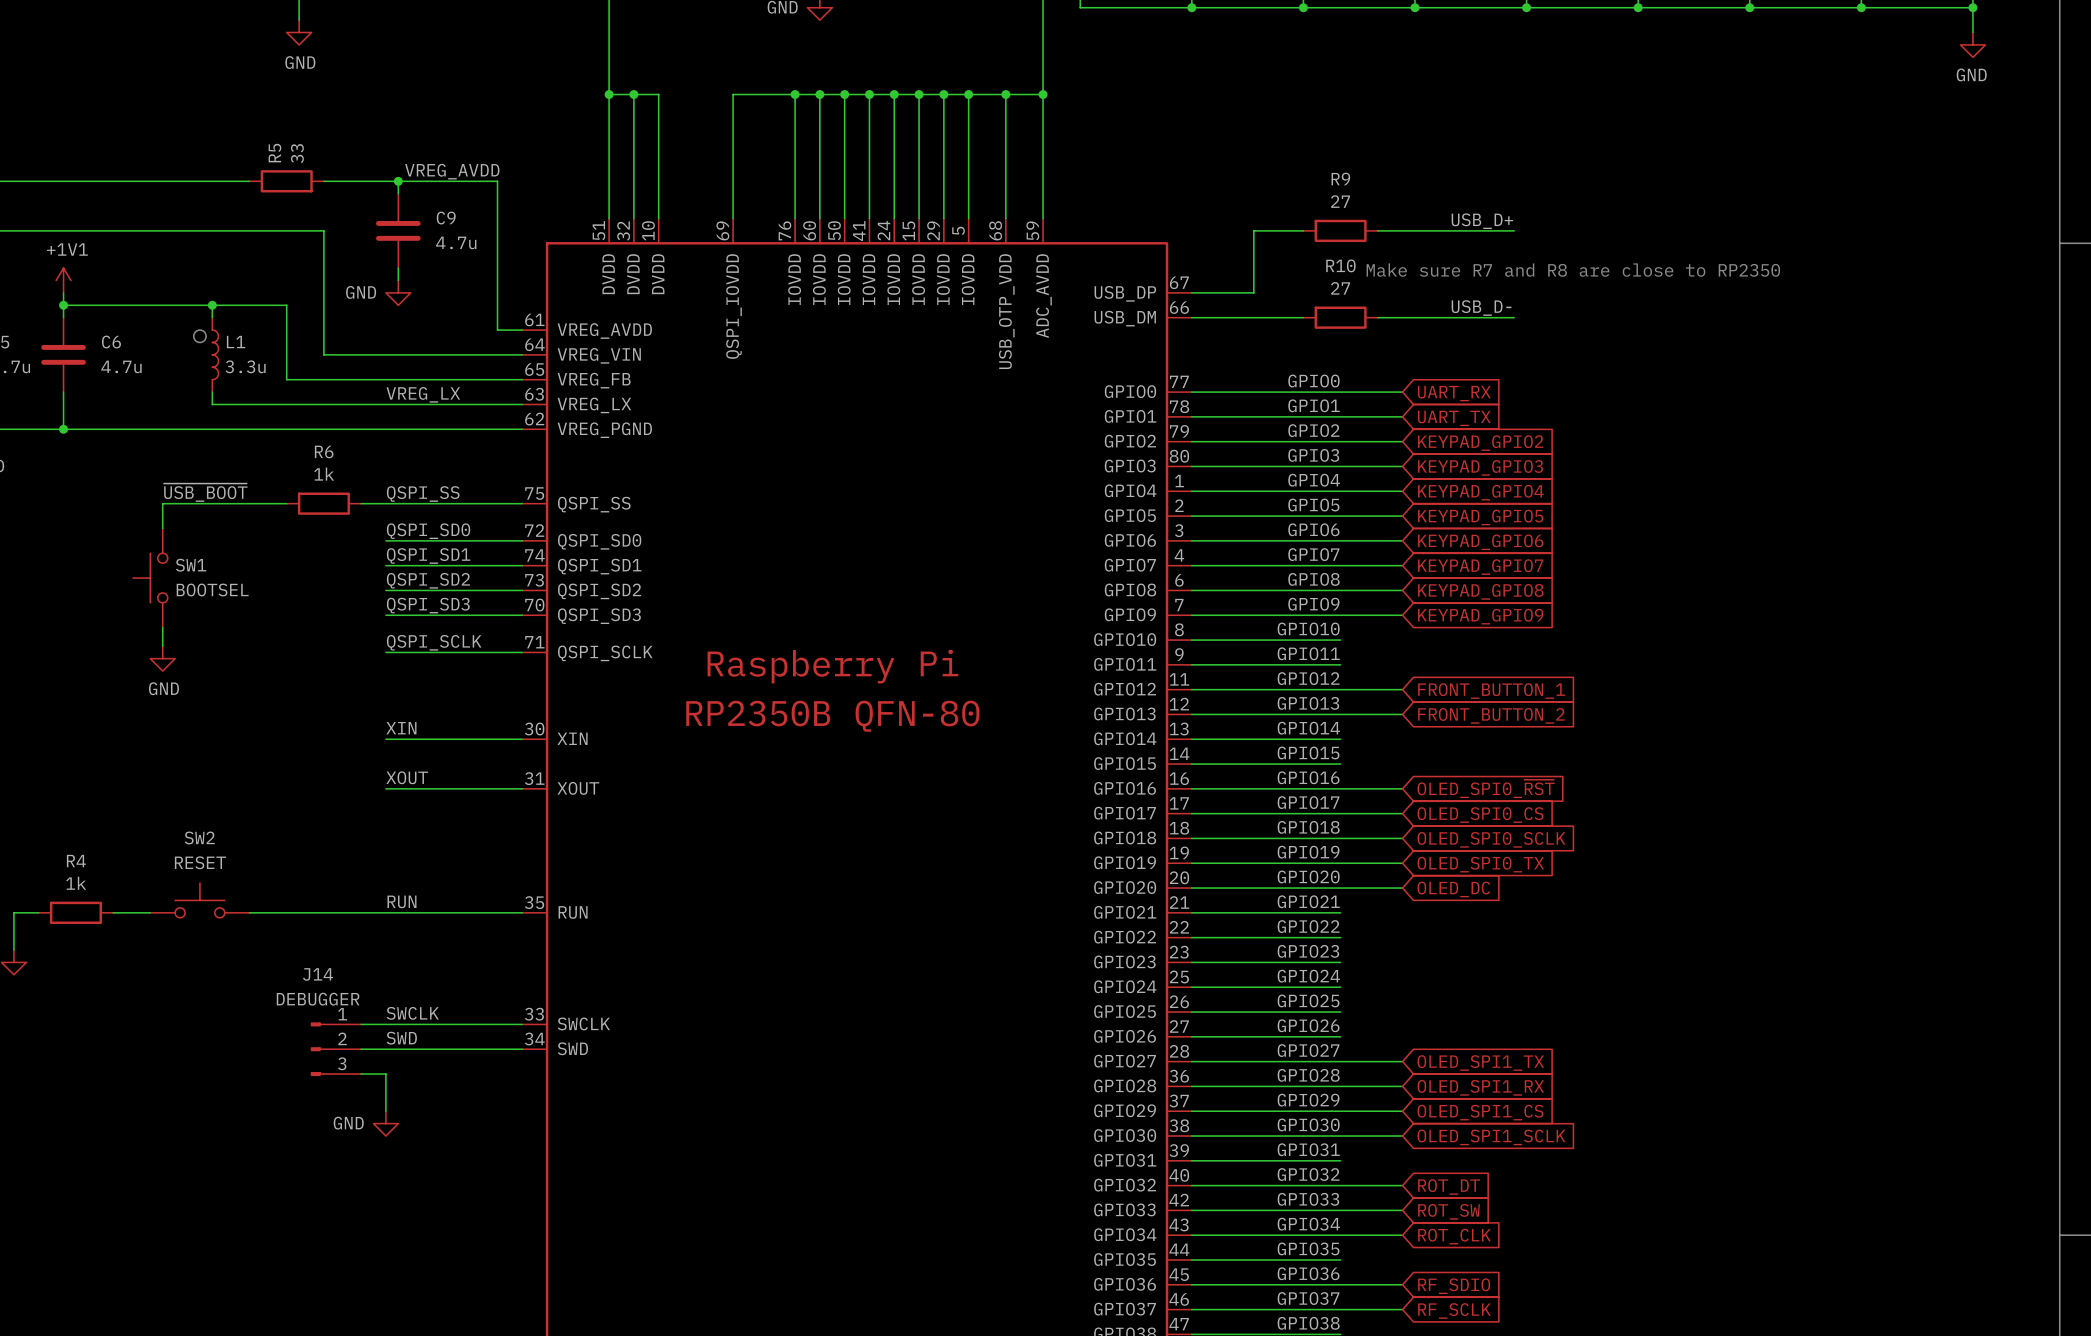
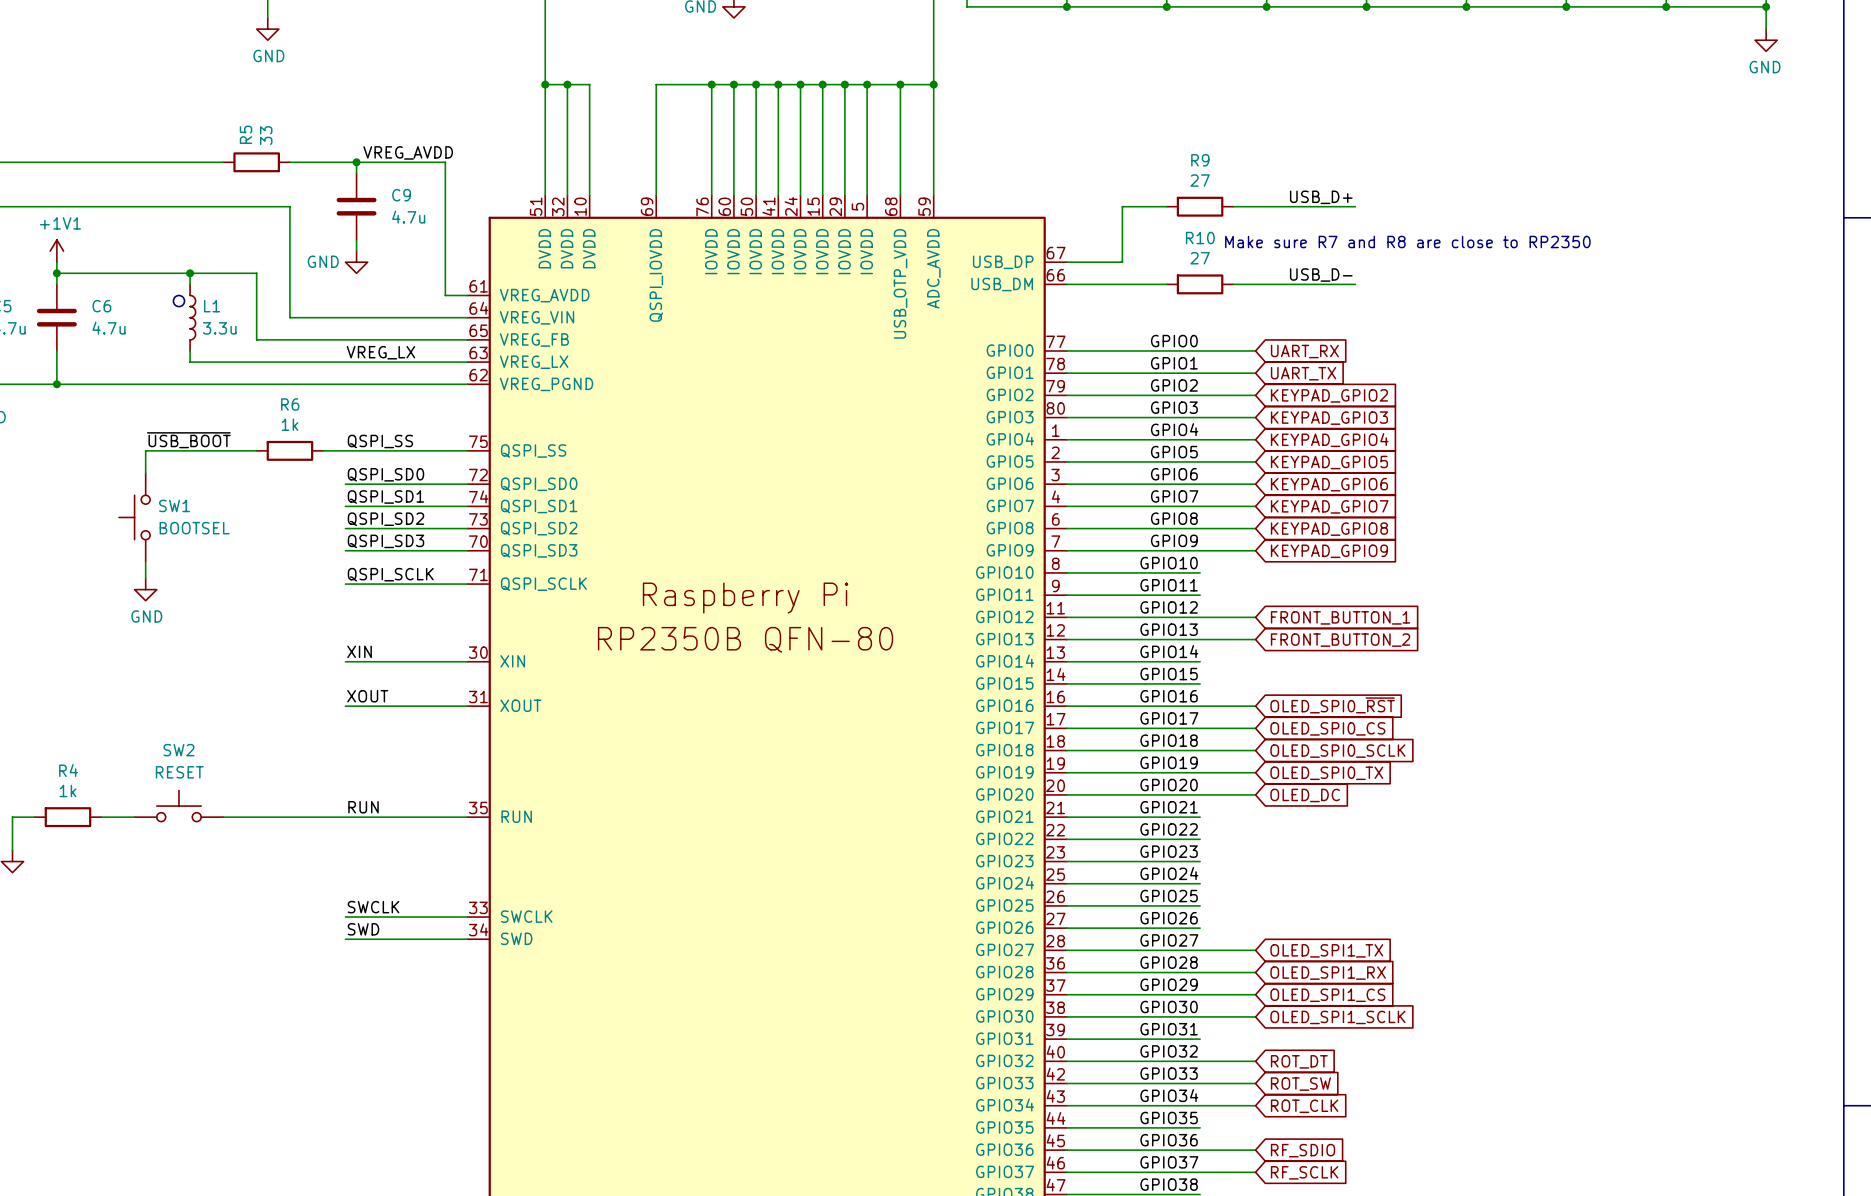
wire: (361, 1024) (385, 1024) -> none
J14: DEBUGGER (335, 1049) -> none
wire: (361, 1049) (385, 1049) -> none
wire: (361, 1074) (385, 1074) (385, 1111) -> none
power symbol: GND (385, 1123) -> none

